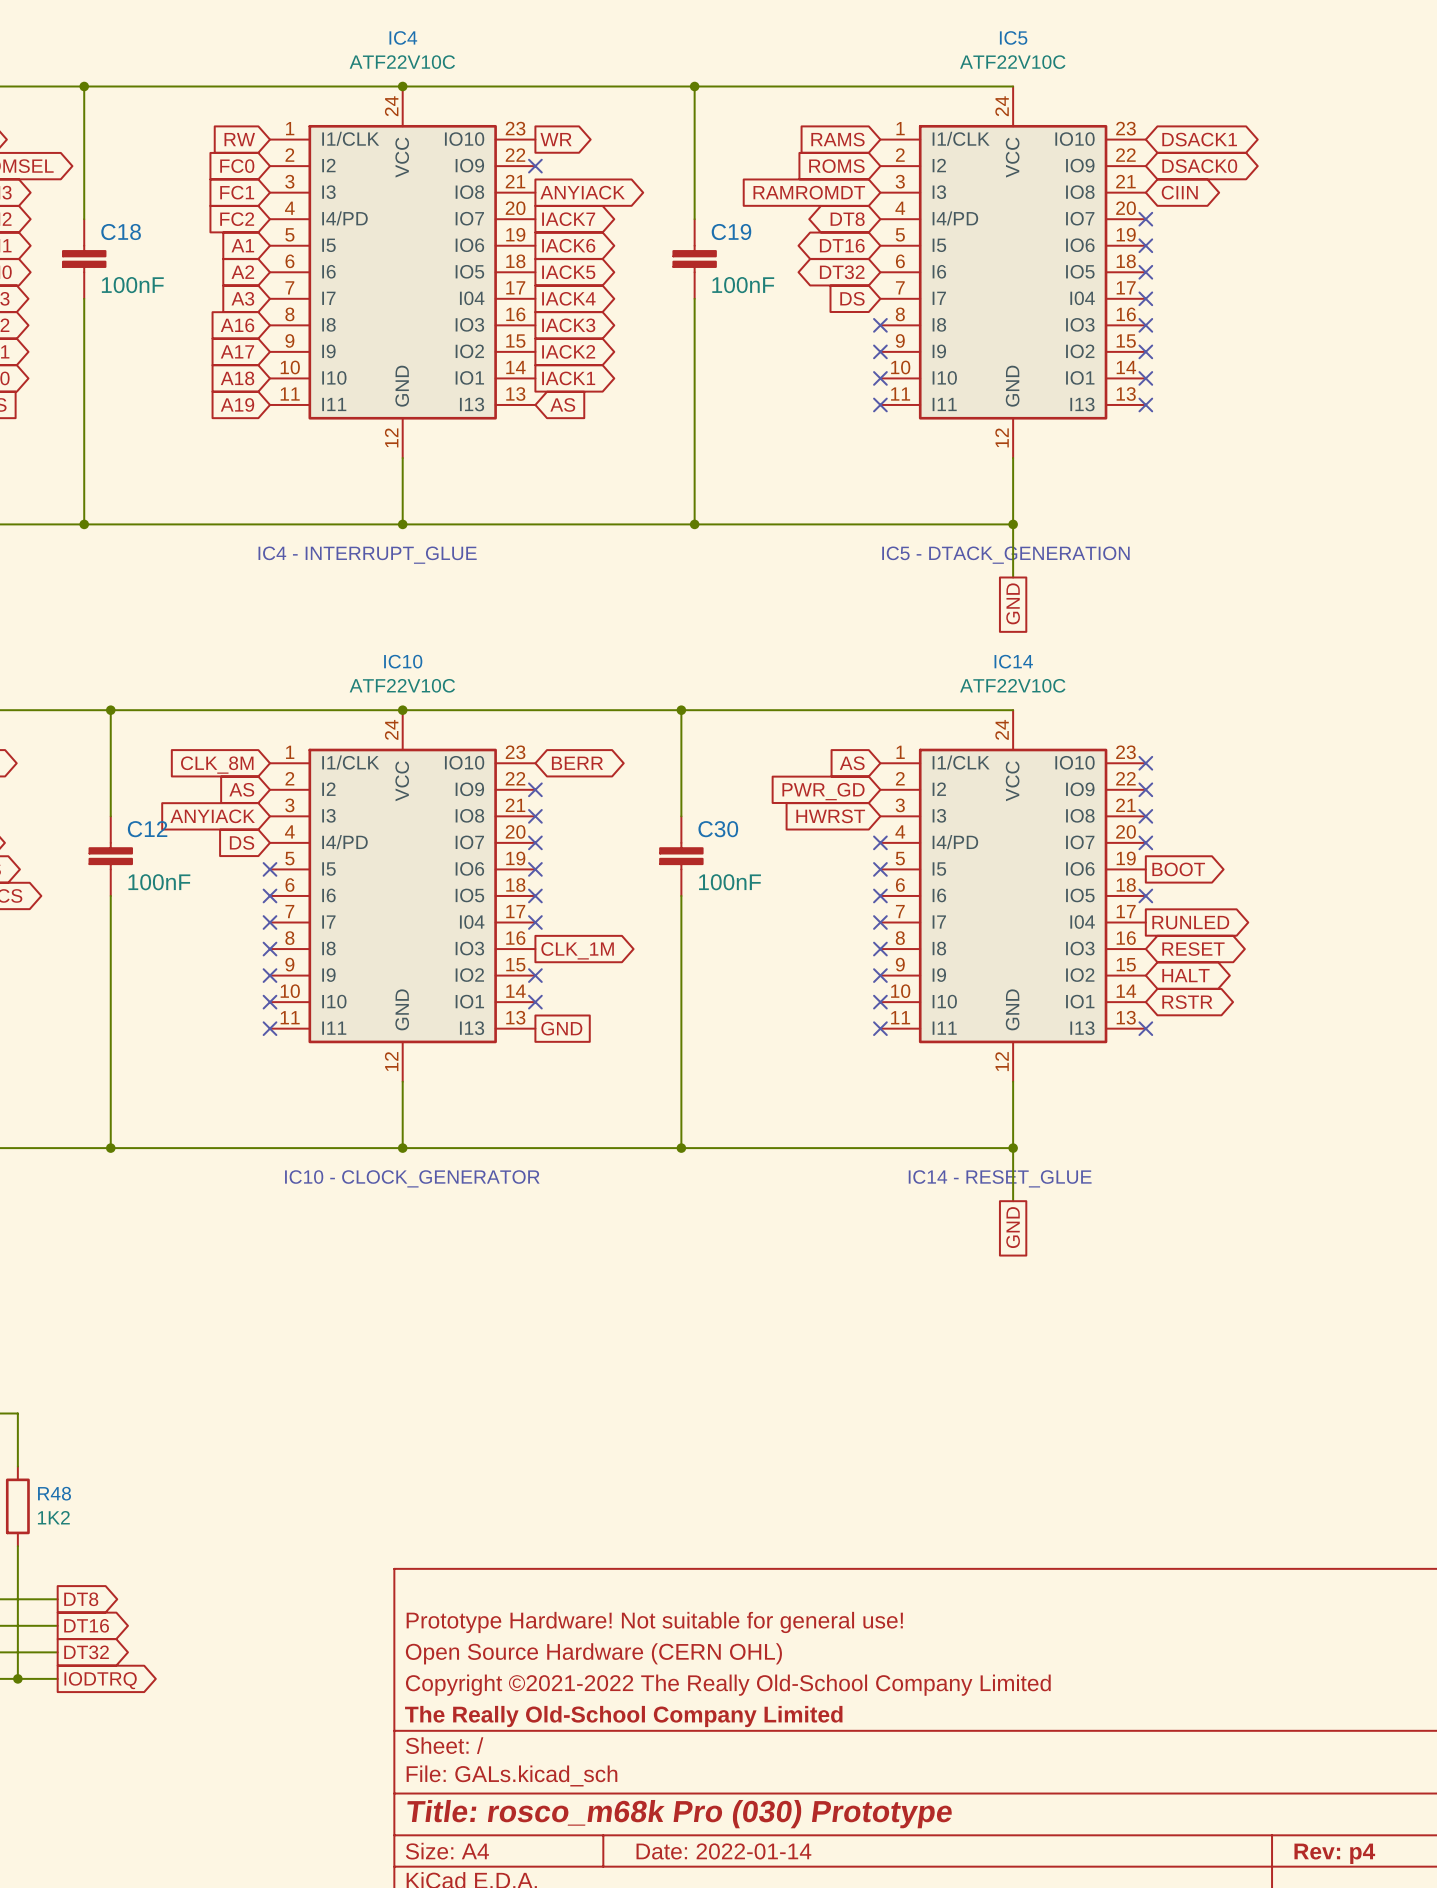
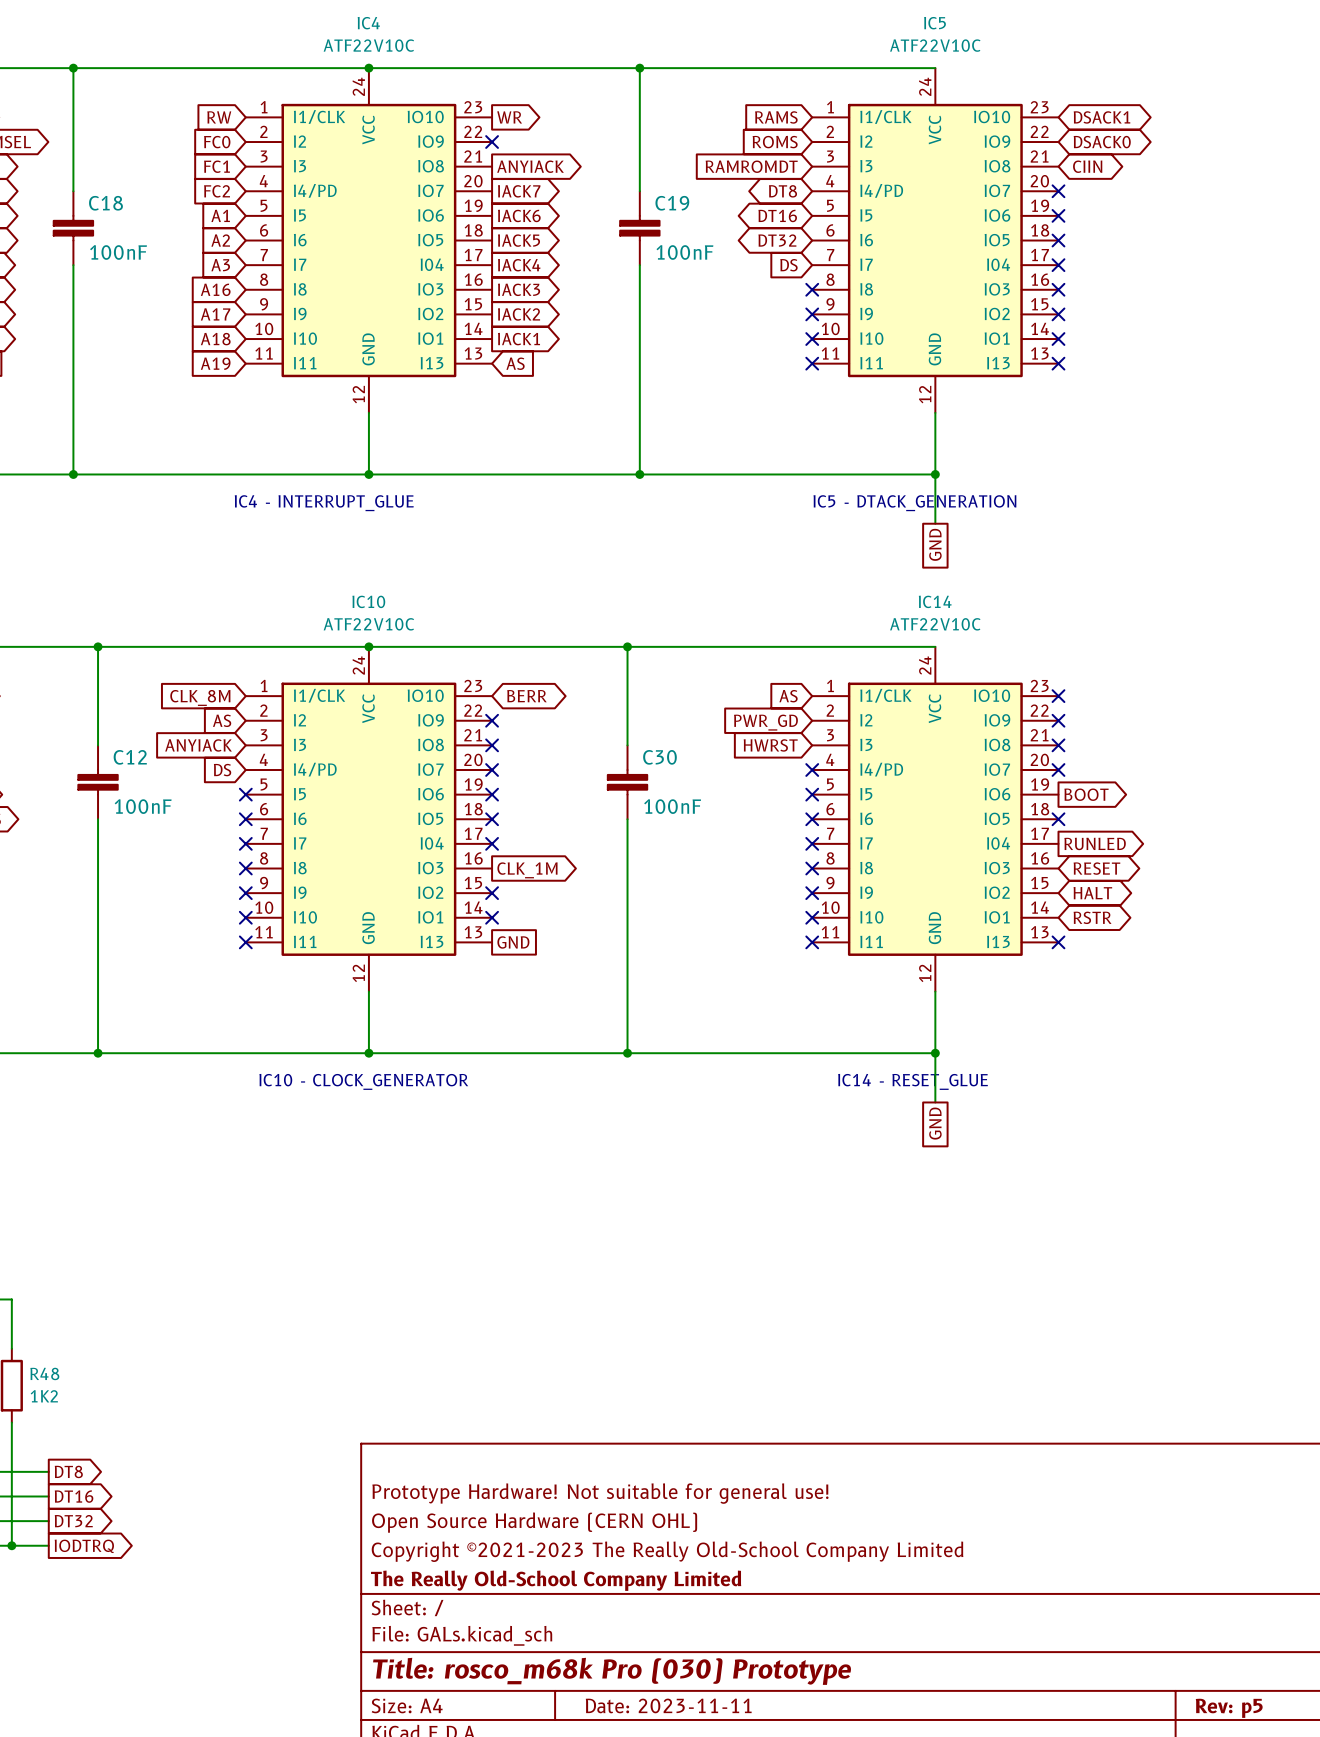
title block: Copyright ©2021-2022 The Really Old-School Company Limited (728, 1685) -> Copyright ©2021-2023 The Really Old-School Company Limited (667, 1551)
title block: Date: 2022-01-14 (723, 1851) -> Date: 2023-11-11 (668, 1705)
title block: Rev: p4 (1334, 1853) -> Rev: p5 (1229, 1708)

